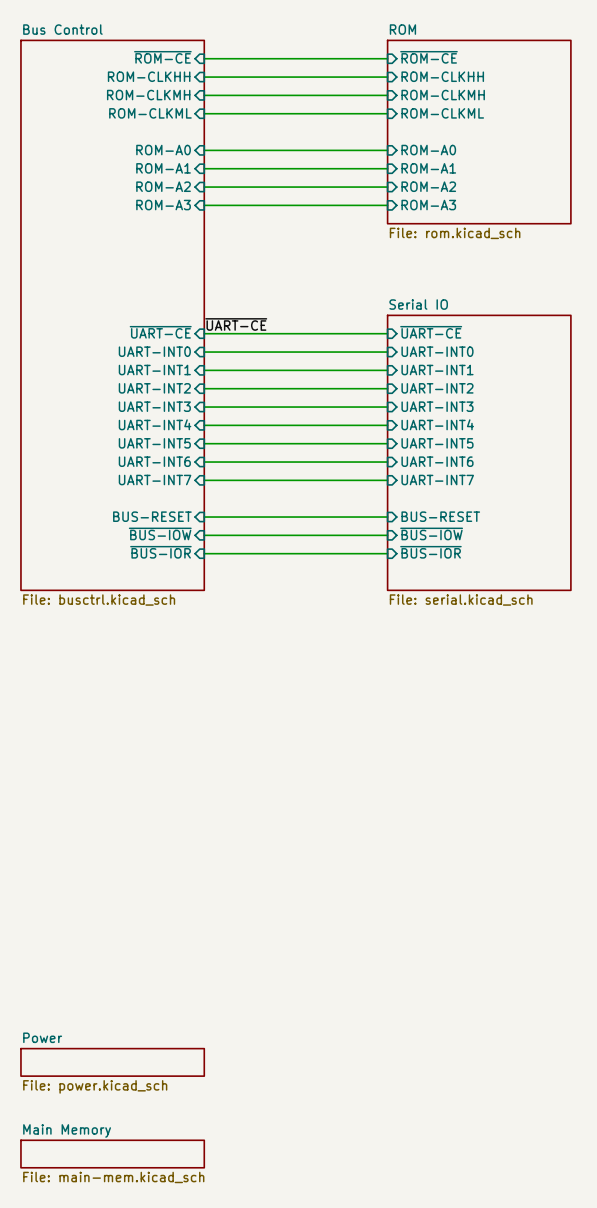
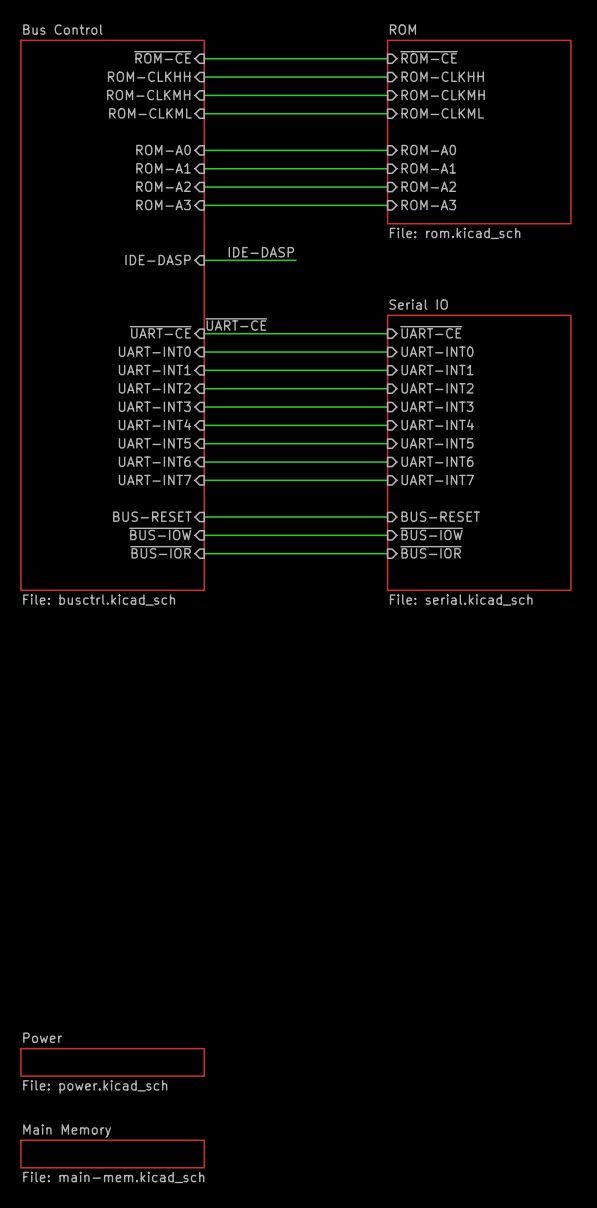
label: none -> IDE-DASP (261, 252)
sheet pin: none -> IDE-DASP (158, 260)
wire: none -> (204, 260) (295, 260)

